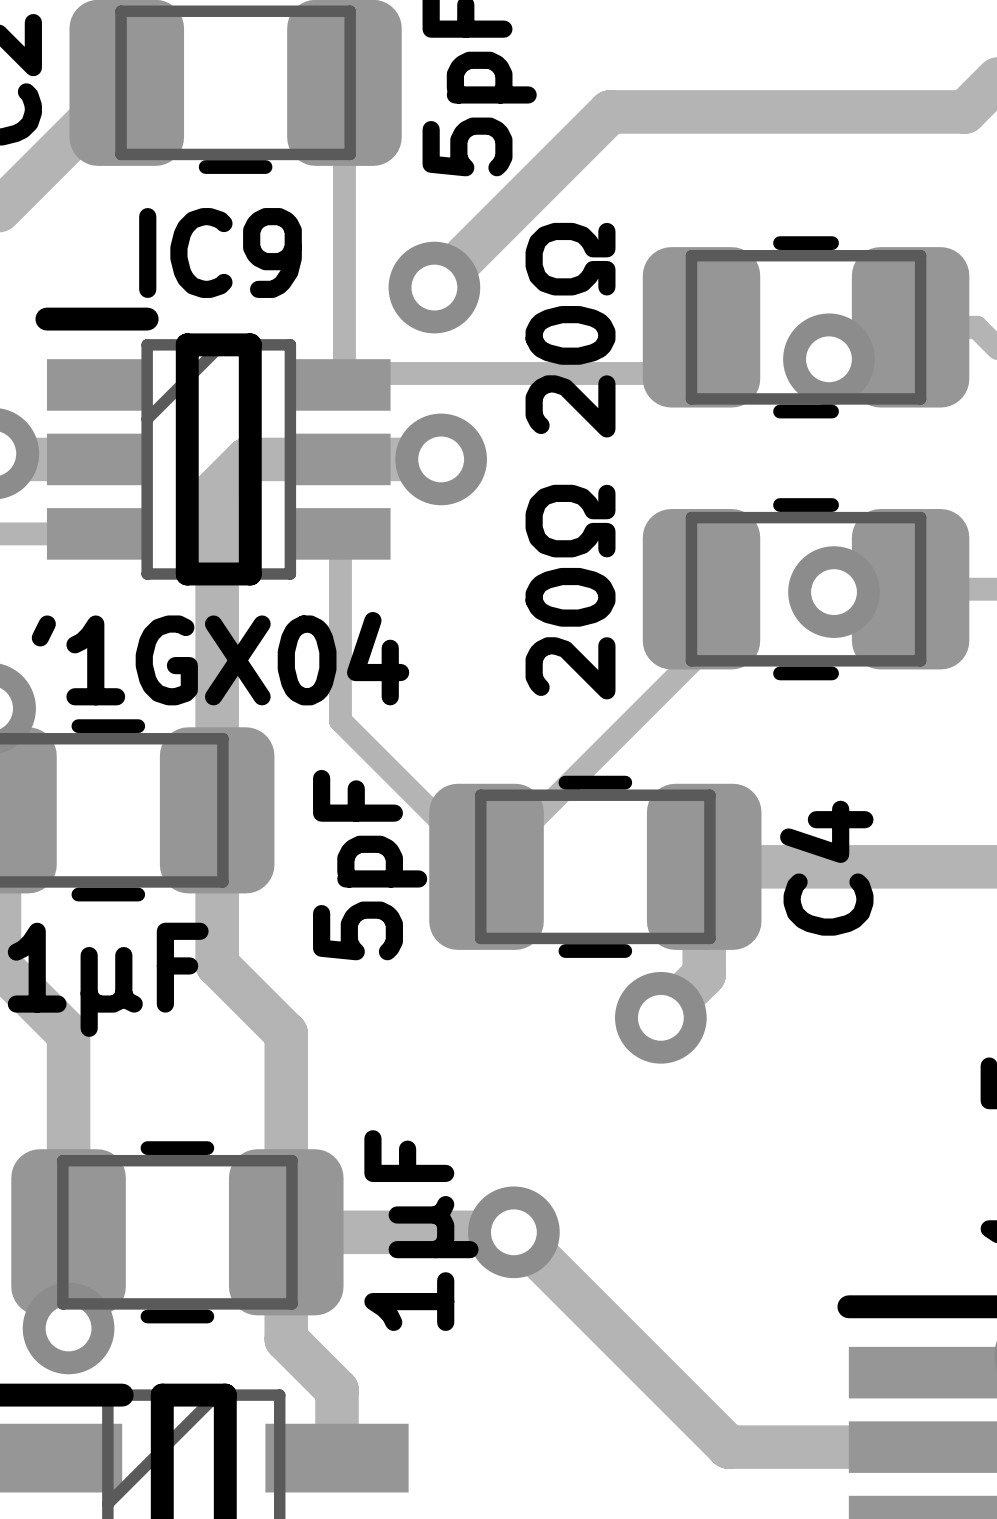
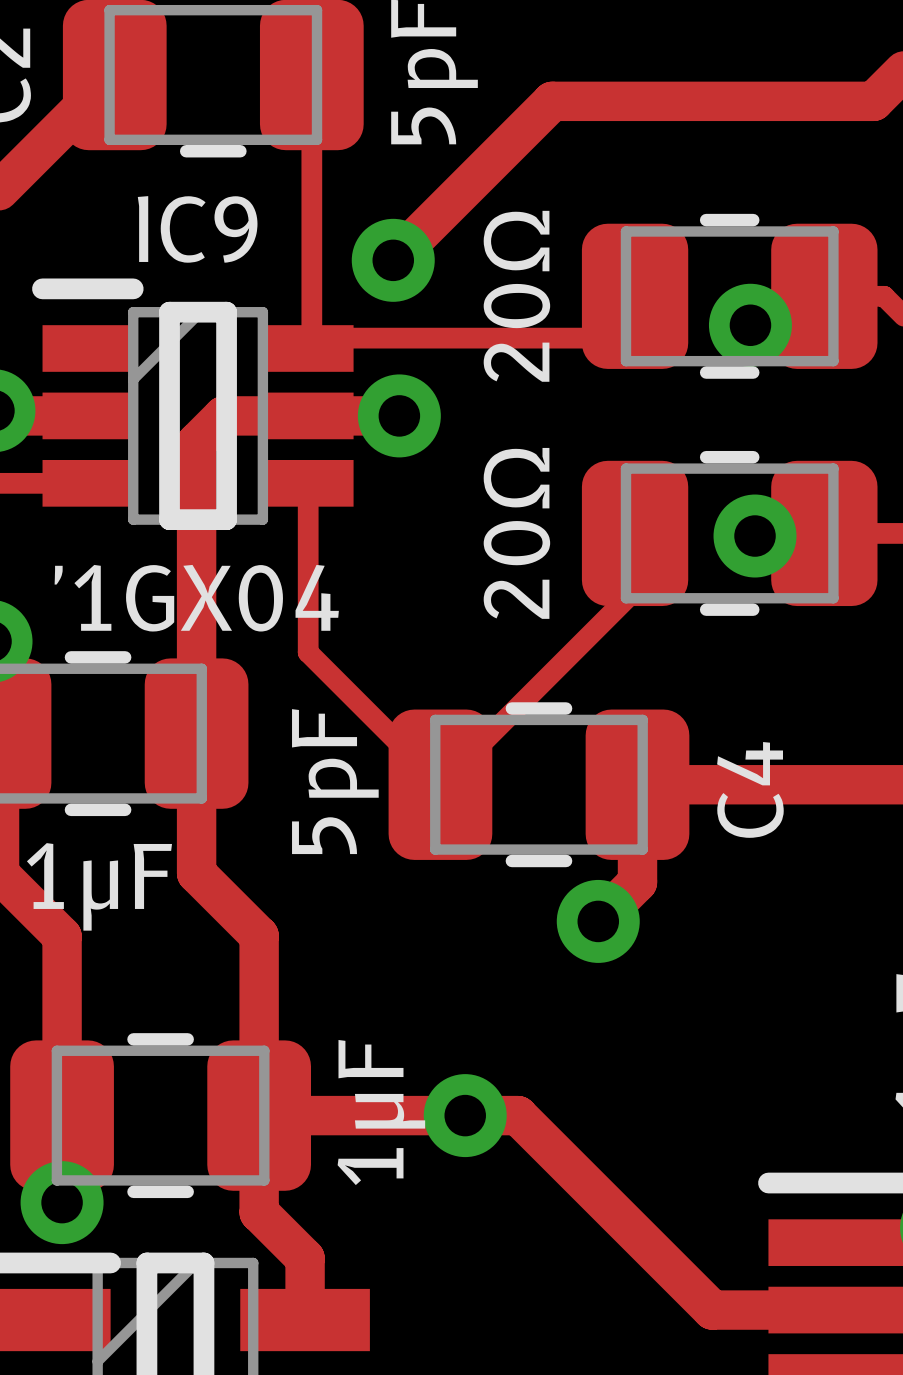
track: (513, 1232) (728, 1447) (786, 1447) -> (465, 1115) (517, 1115) (712, 1310)

